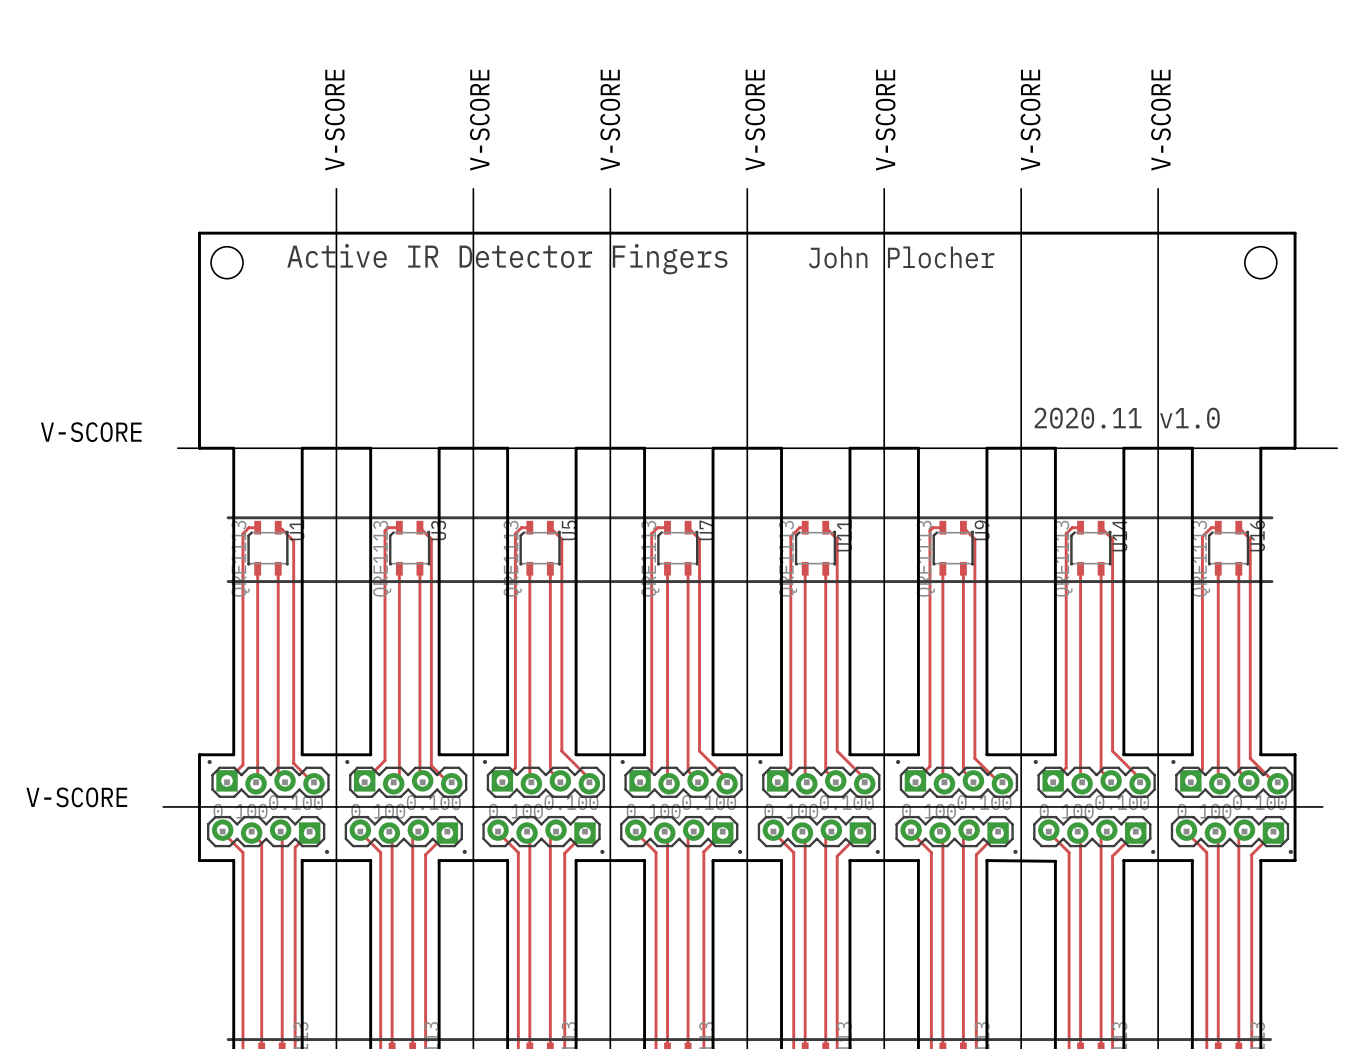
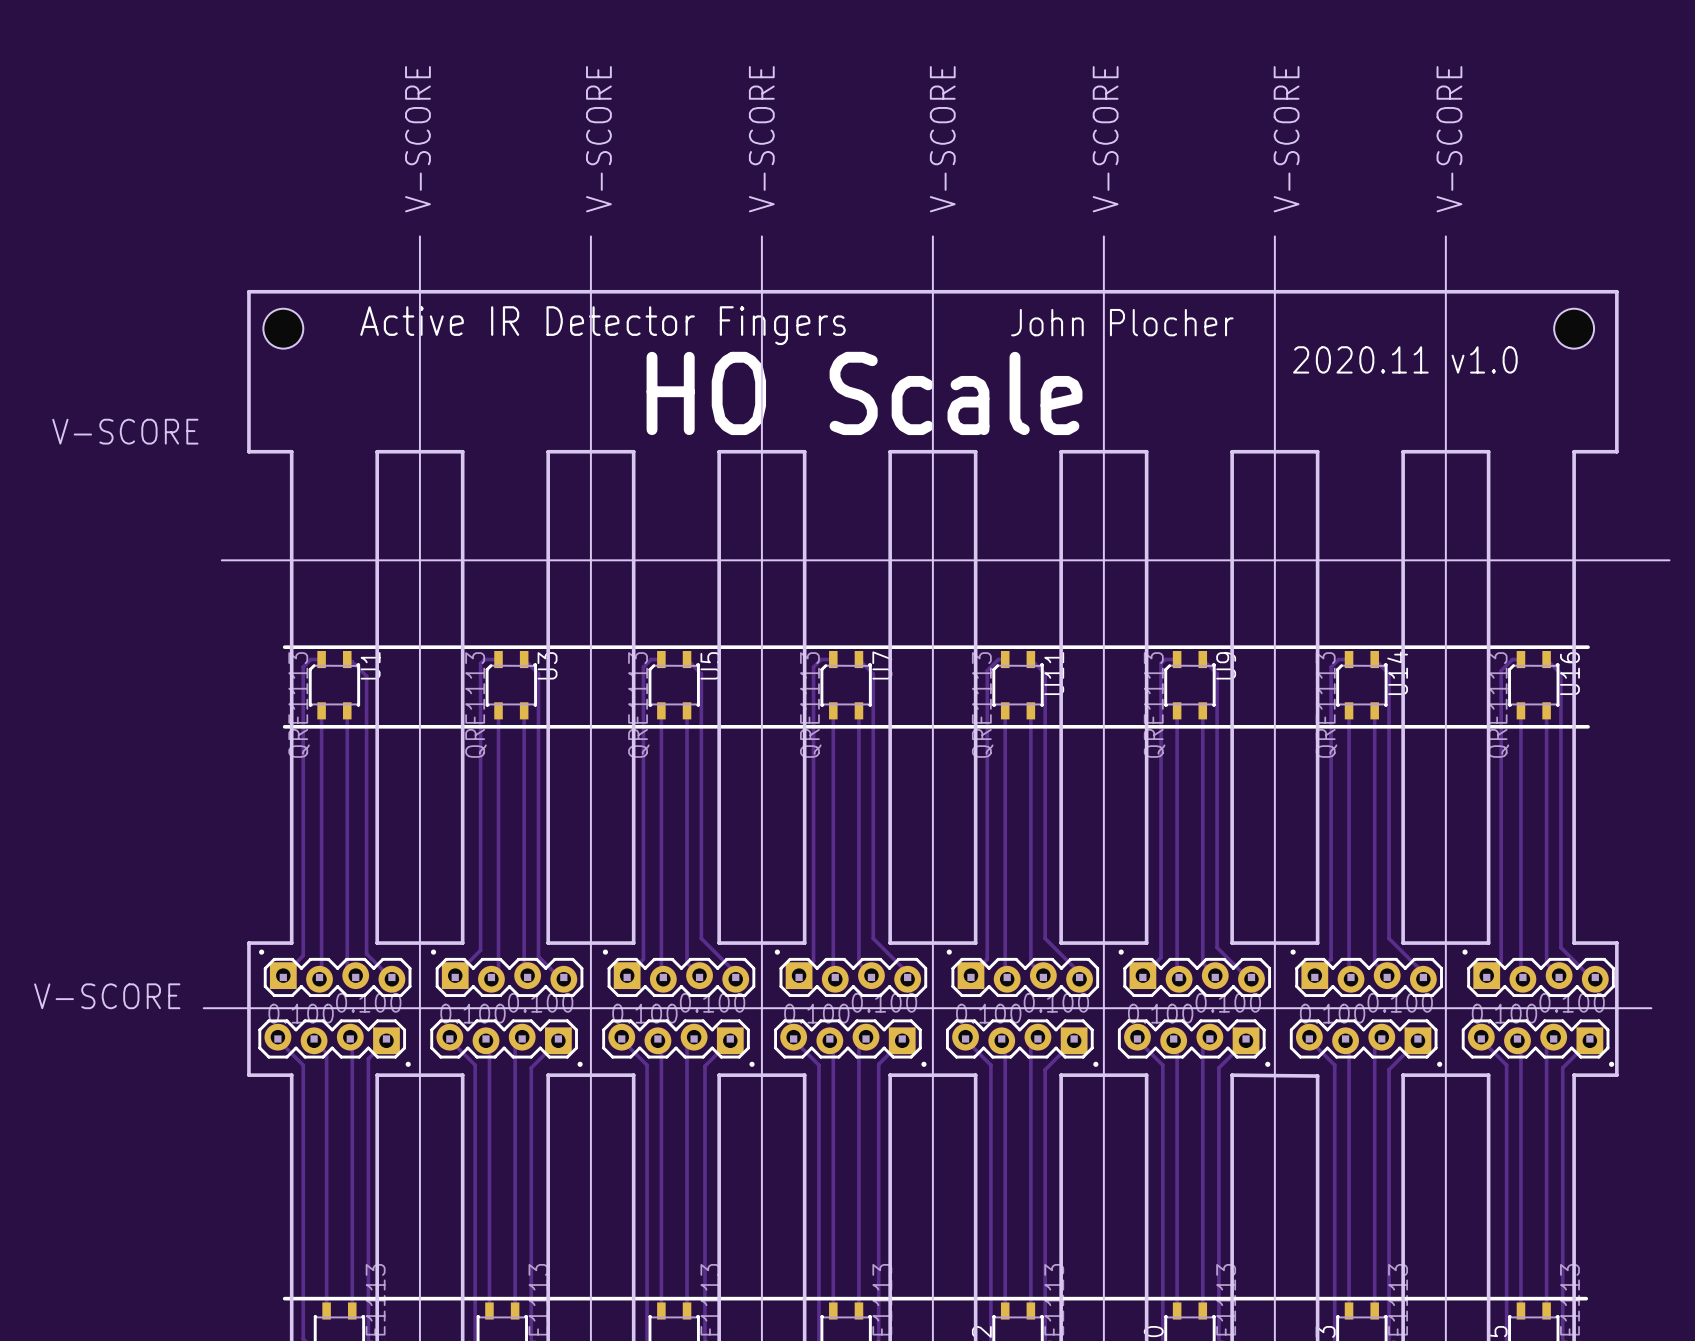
text: none -> HO Scale (864, 393)
board edge: (199, 361) (199, 448) (233, 448) -> (248, 451) (291, 451) (291, 560)
board edge: (1295, 361) (1295, 448) (1260, 448) -> (1616, 451) (1574, 451) (1574, 560)
text position: 2020.11 v1.0 (1127, 418) -> 2020.11 v1.0 (1405, 359)
text position: V-SCORE (91, 432) -> V-SCORE (125, 431)
board edge: (302, 448) (370, 448) -> (377, 560) (377, 451) (462, 451) (462, 560)
board edge: (439, 448) (507, 448) -> (548, 560) (548, 451) (633, 451) (633, 560)
board edge: (576, 448) (644, 448) -> (719, 560) (719, 451) (804, 451) (804, 560)
board edge: (713, 448) (781, 448) -> (890, 560) (890, 451) (975, 451) (975, 560)
board edge: (849, 448) (918, 448) -> (1061, 560) (1061, 451) (1146, 451) (1146, 560)
board edge: (986, 448) (1055, 448) -> (1232, 560) (1232, 451) (1317, 451) (1317, 560)
board edge: (1123, 448) (1192, 448) -> (1403, 560) (1403, 451) (1488, 451) (1488, 560)

